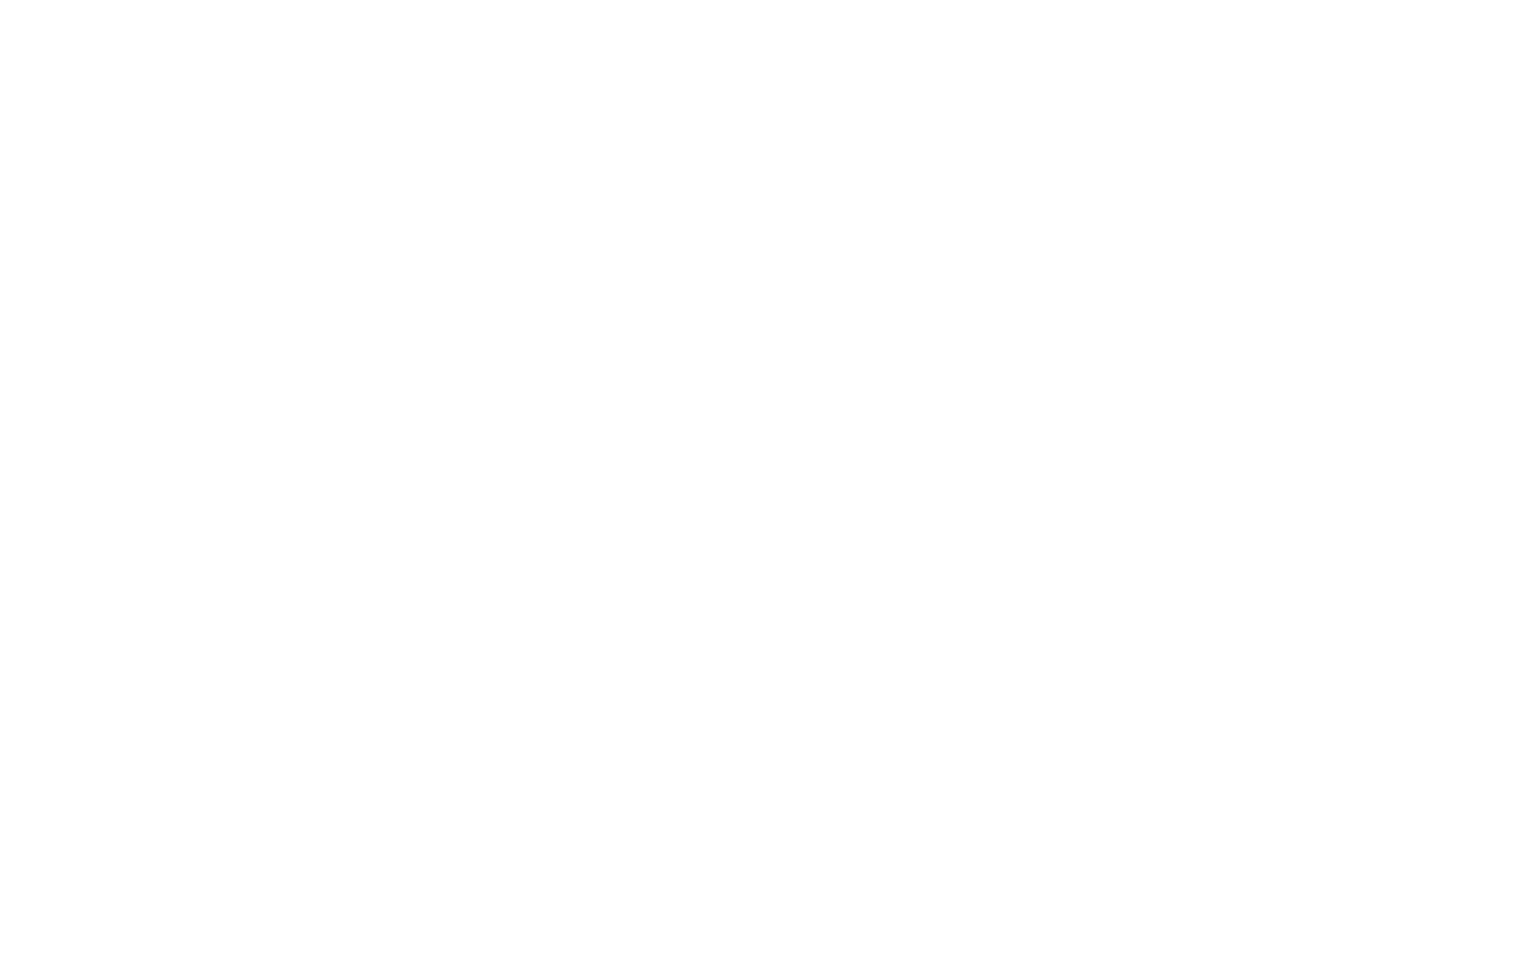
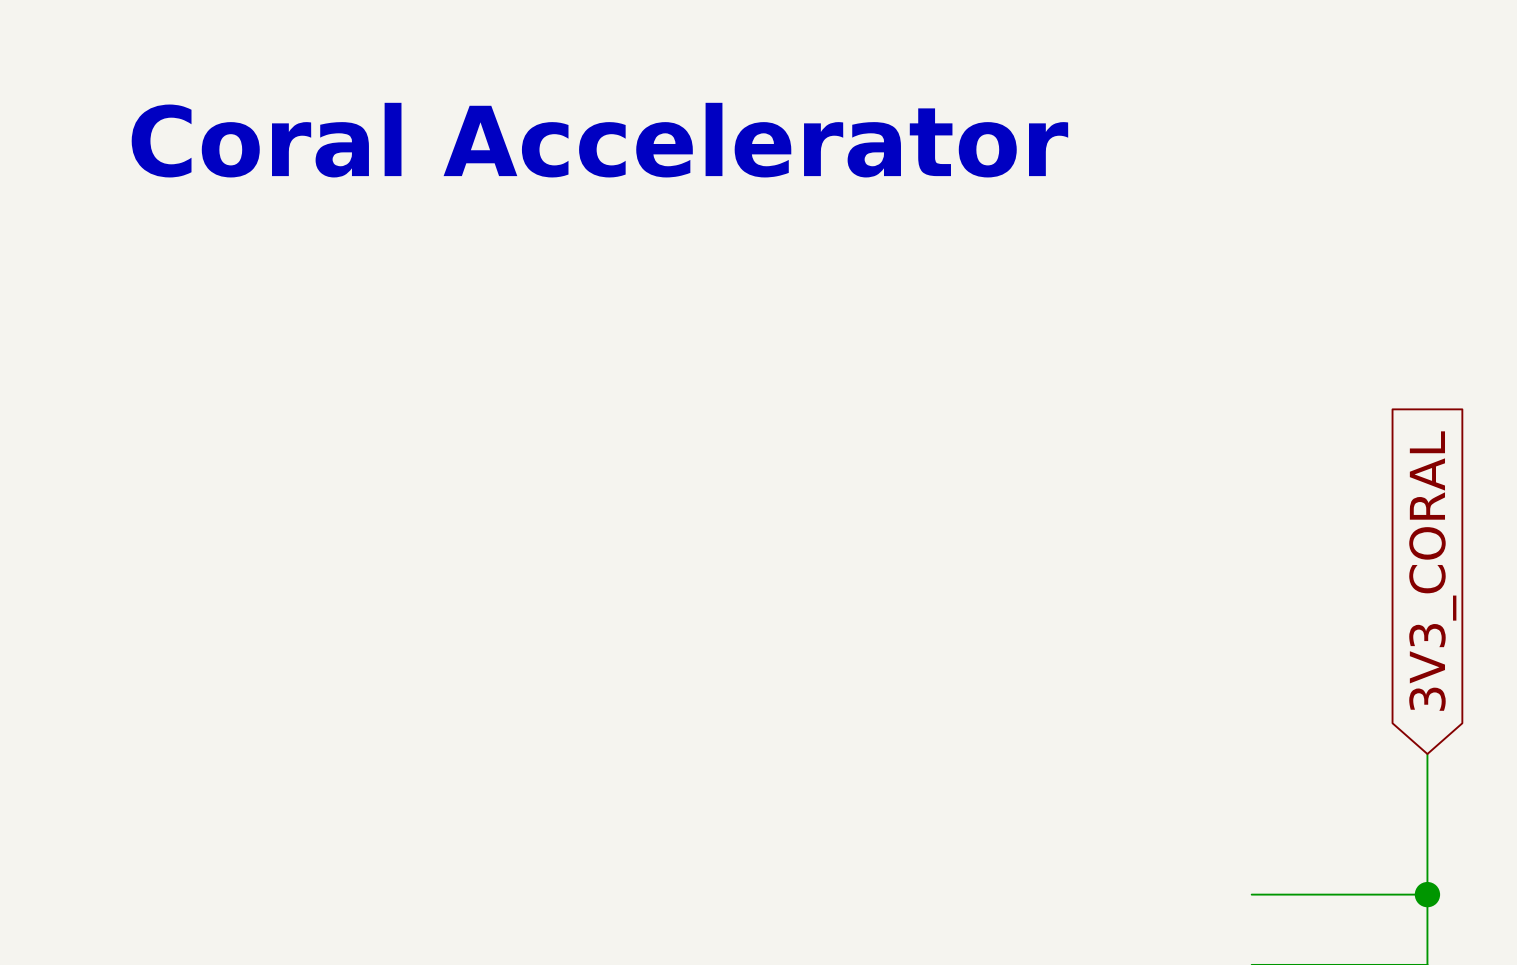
text: none -> Coral Accelerator (599, 140)
global label: none -> 3V3_CORAL (1432, 571)
wire: none -> (1427, 754) (1427, 964) (1251, 964)
wire: none -> (1251, 894) (1427, 894)
junction: none -> (1427, 894)

